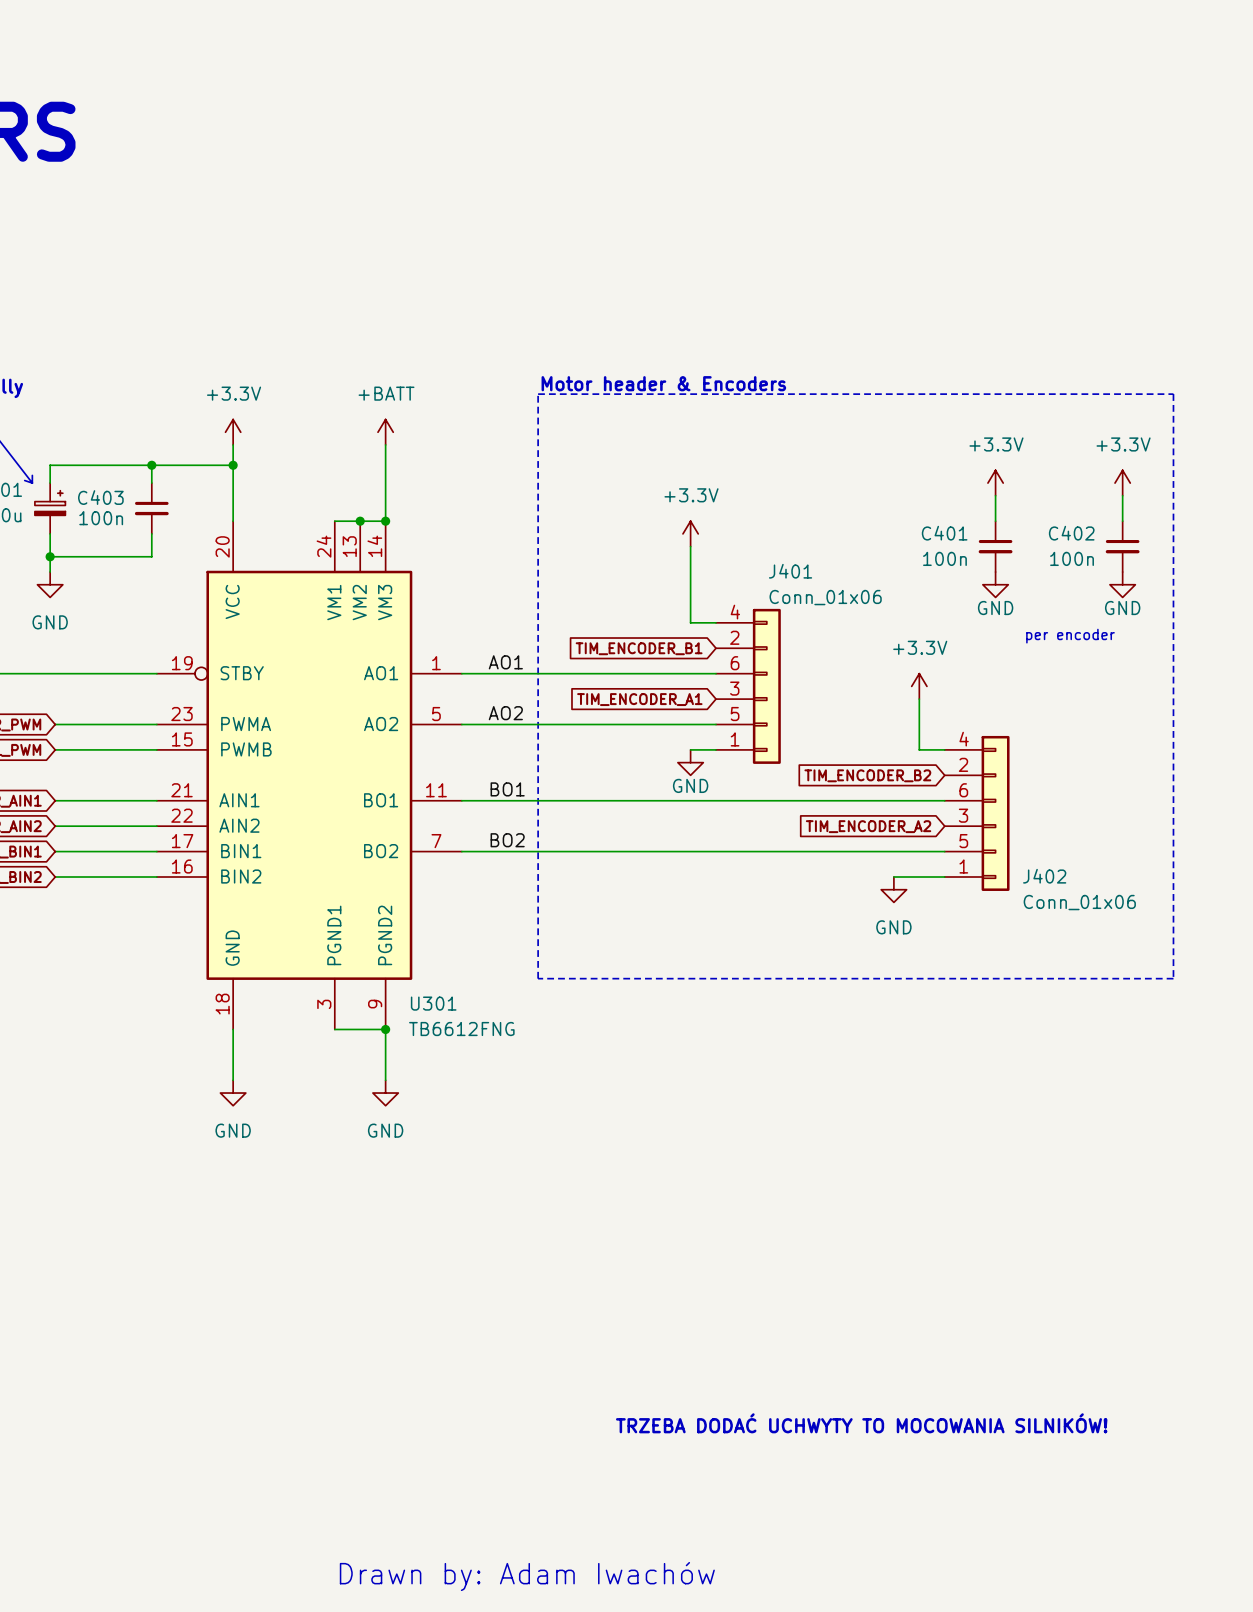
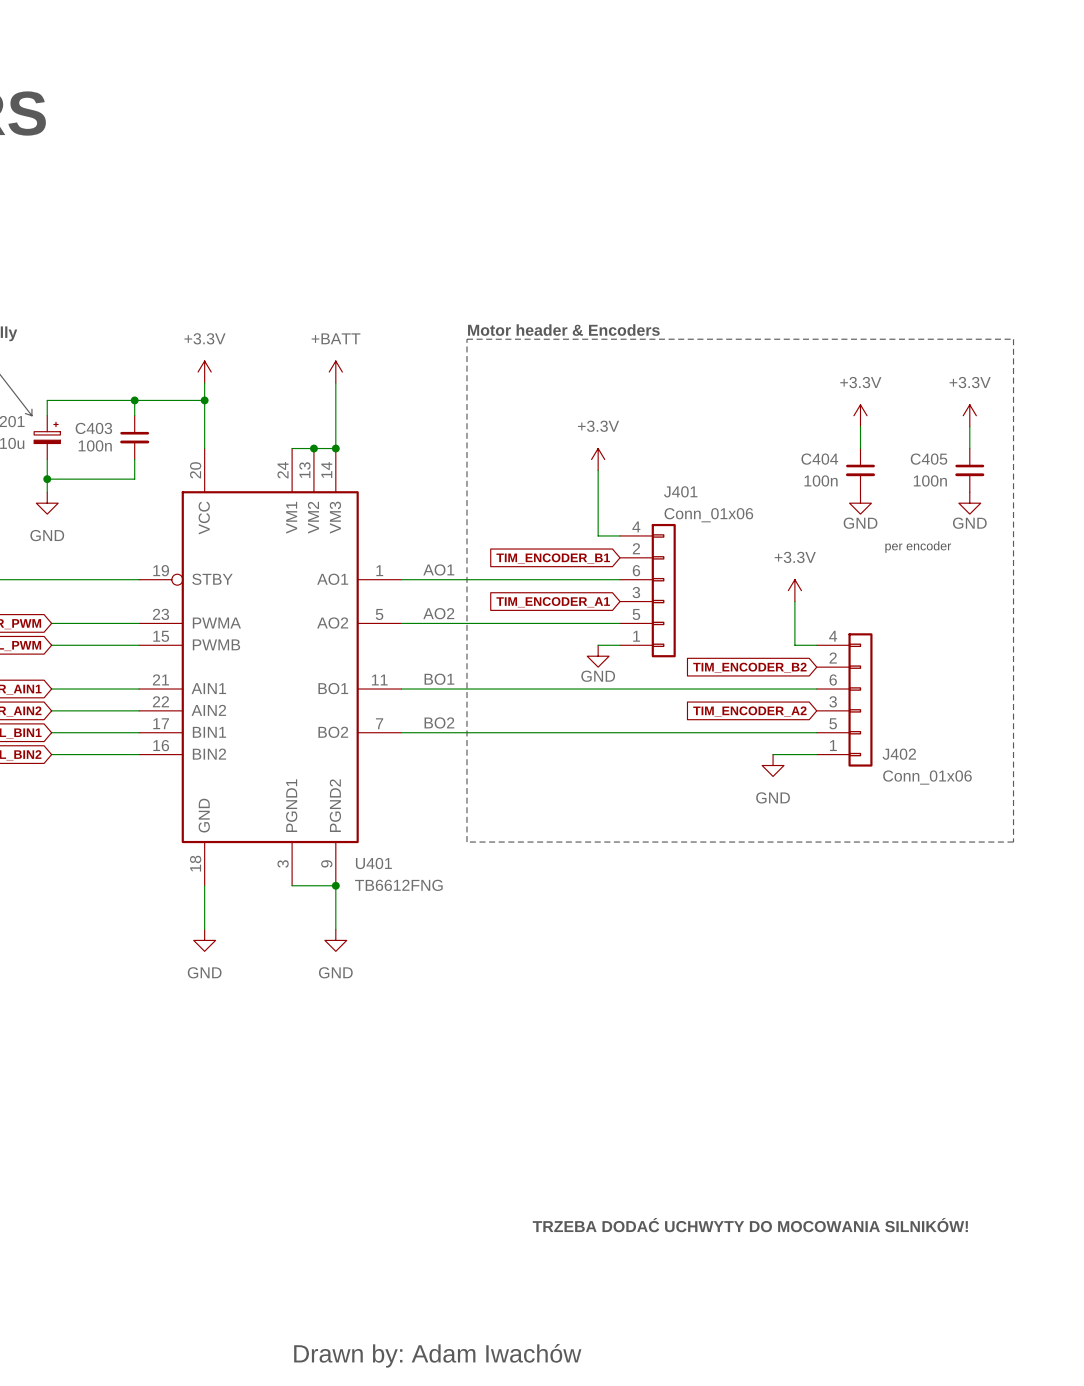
C401 name: C401 (944, 533) -> C404 (819, 459)
C402 name: C402 (1071, 533) -> C405 (929, 459)
U301 name: U301 (433, 1003) -> U401 (373, 863)
text: TRZEBA DODAĆ UCHWYTY TO MOCOWANIA SILNIKÓW! (861, 1423) -> TRZEBA DODAĆ UCHWYTY DO MOCOWANIA SILNIKÓW! (750, 1225)

